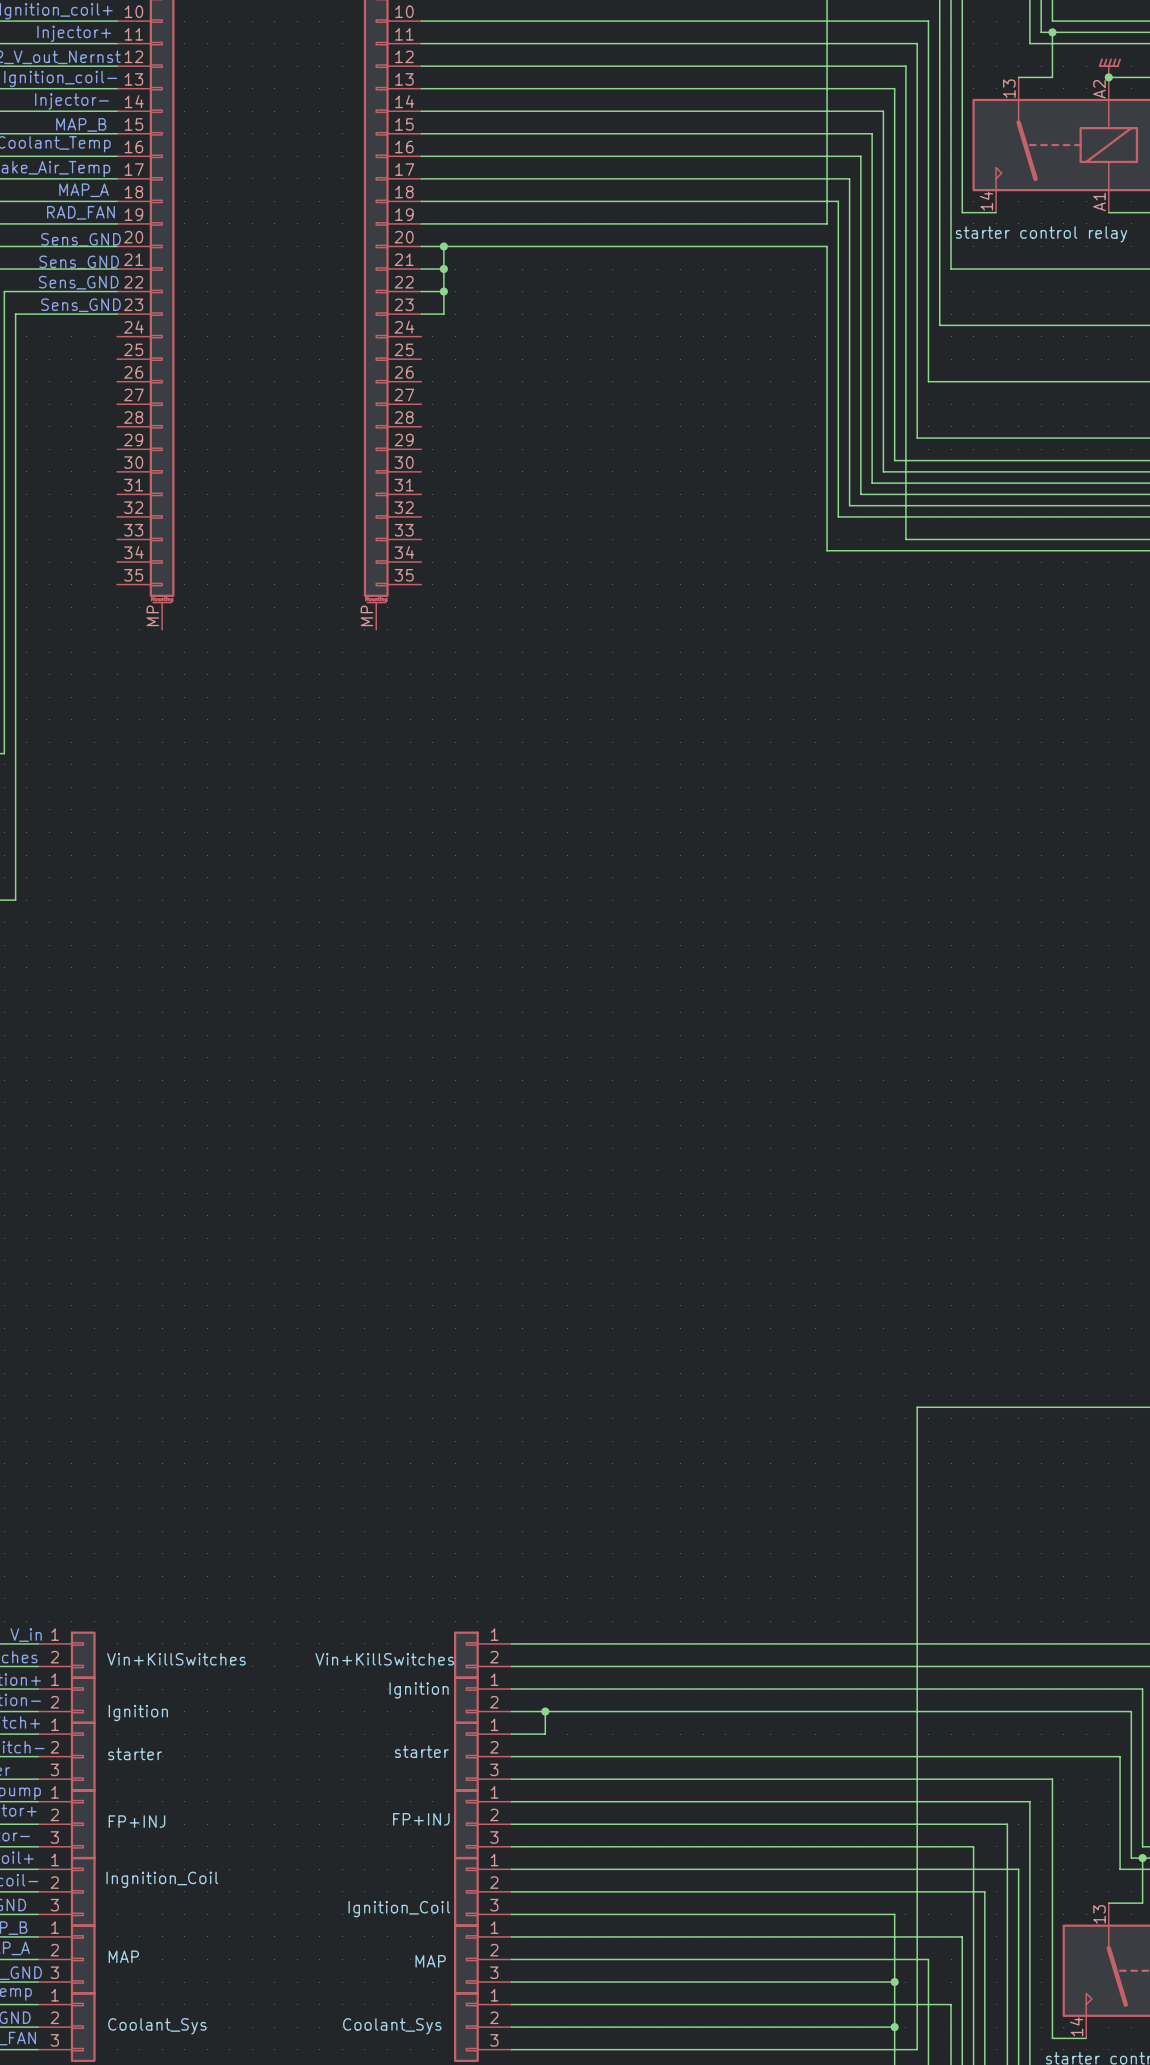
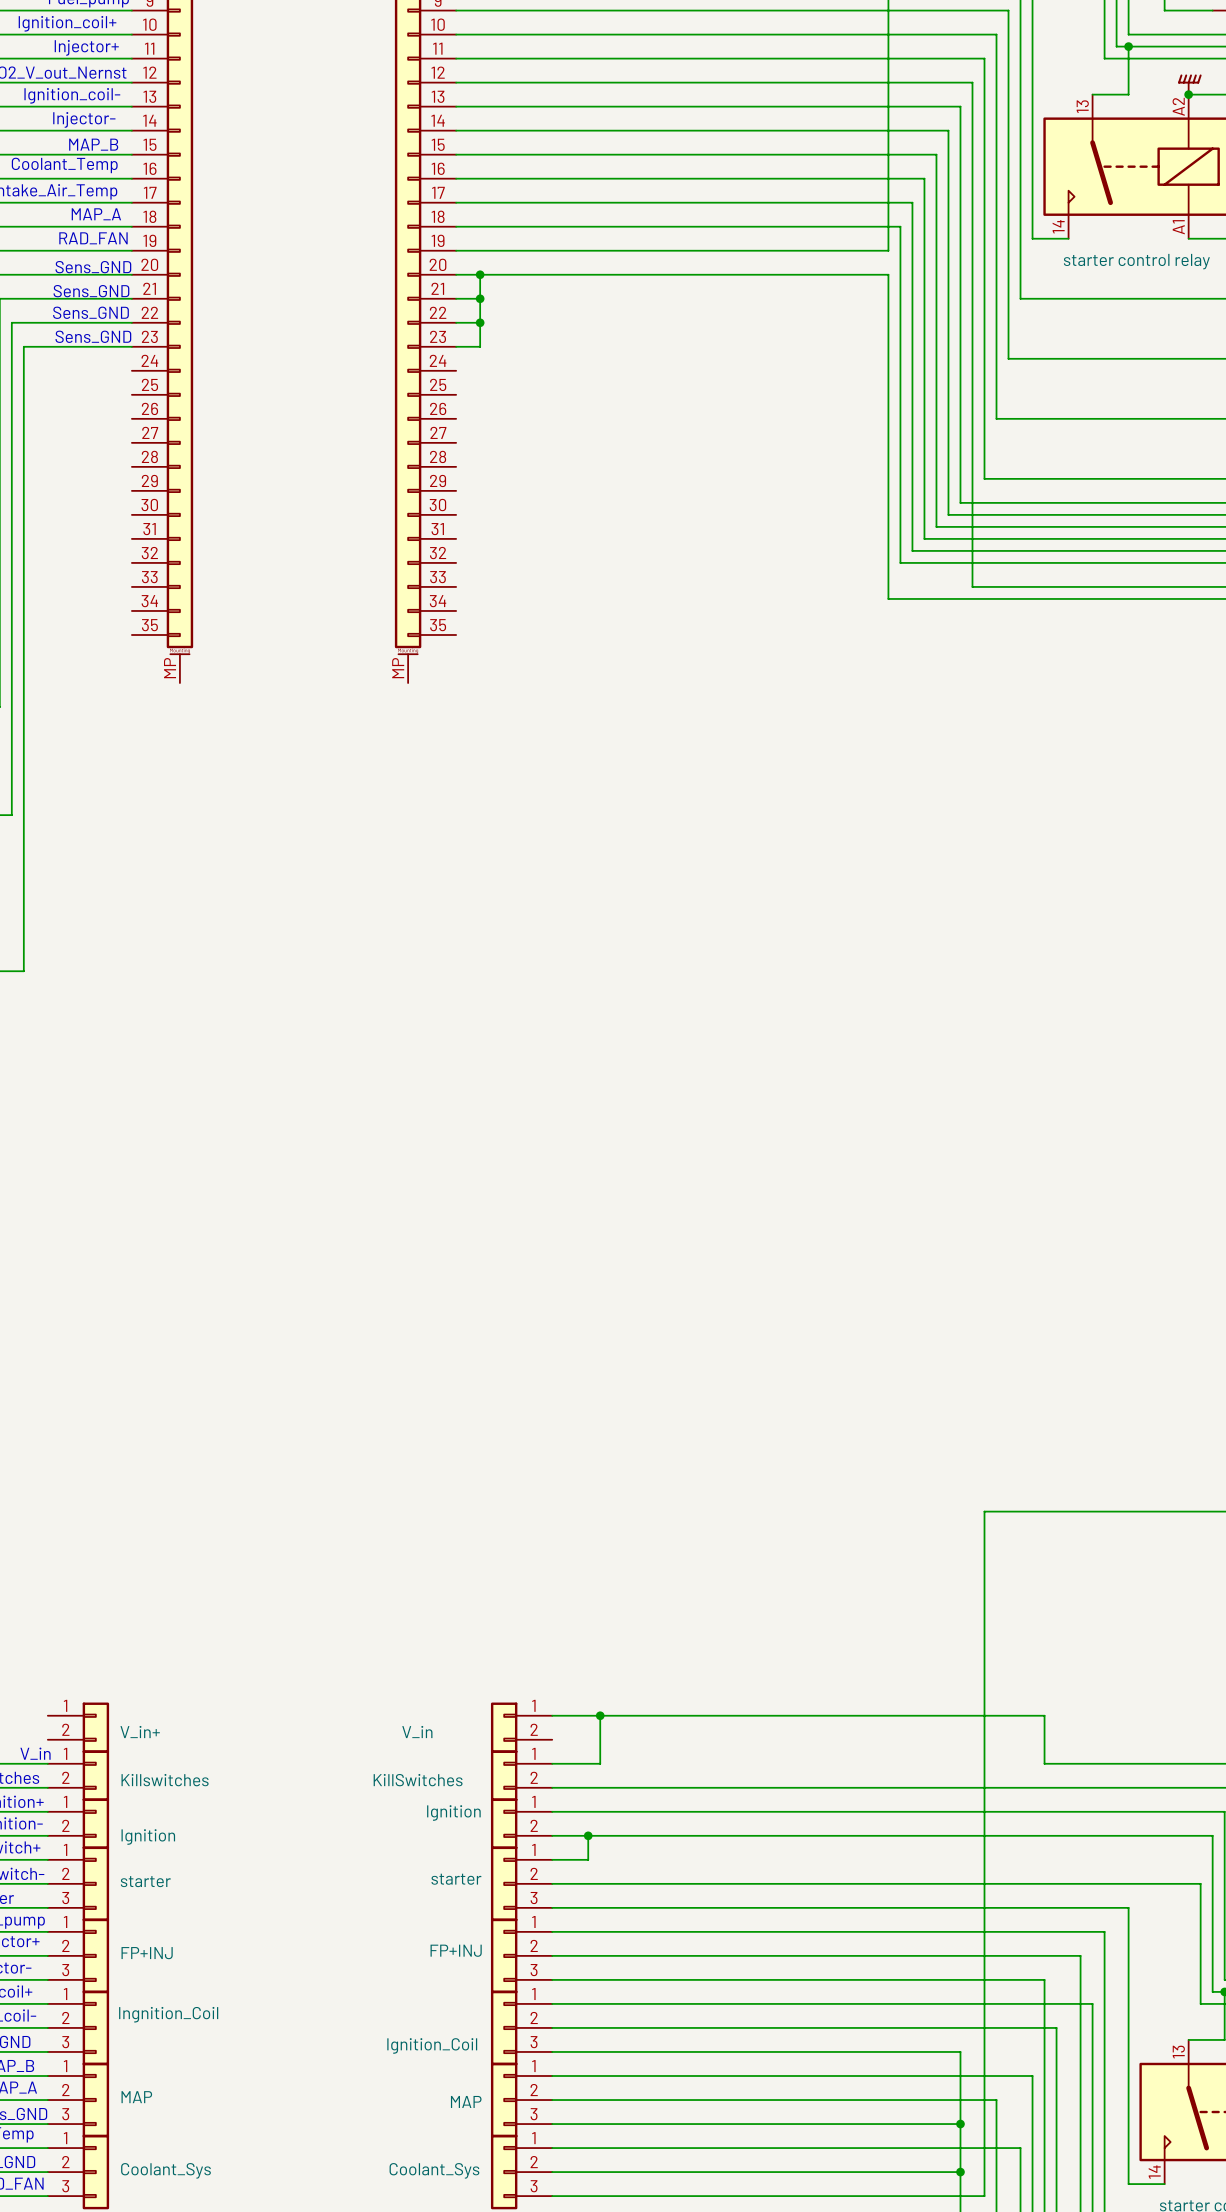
wire: none -> (600, 1715) (600, 1763)
junction: none -> (600, 1715)
part: none -> V_in+ (78, 1727)
part: none -> V_in (521, 1727)
wire: (556, 1643) (973, 1643) -> (552, 1715) (1044, 1715) (1044, 1763)
part value: Vin+KillSwitches (176, 1659) -> Killswitches (165, 1780)
part value: Vin+KillSwitches (384, 1659) -> KillSwitches (418, 1780)

